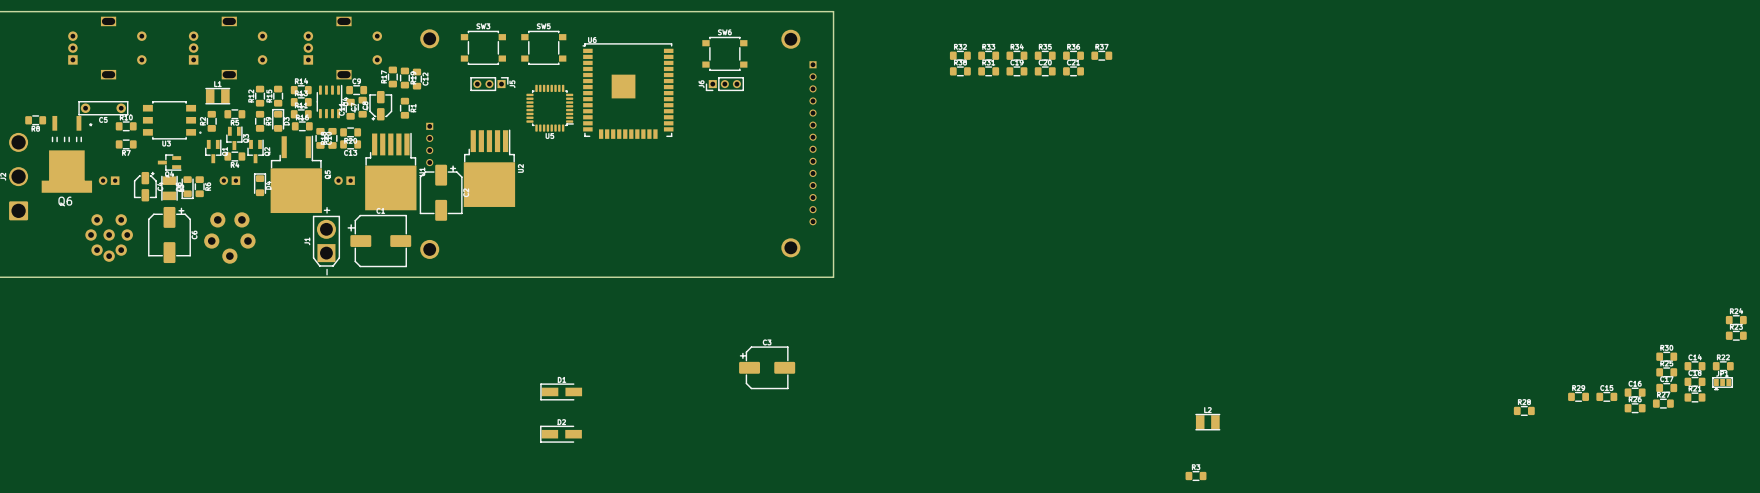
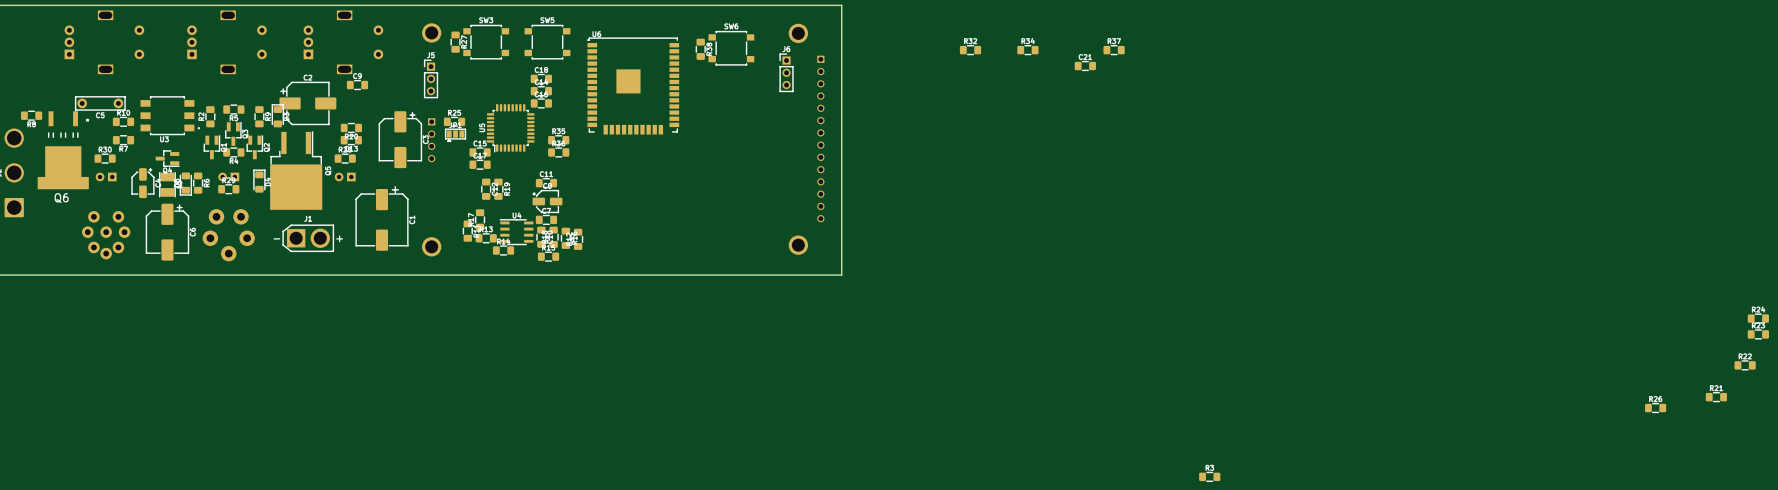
part: (988, 55) -> none
part position: (1045, 55) -> (558, 140)
part position: (1073, 55) -> (558, 152)
part rotation: 0° (960, 71) -> 90° clockwise (700, 49)
part position: (960, 71) -> (700, 49)
part: (988, 71) -> none
part: (1016, 71) -> none
part: (1045, 71) -> none
part position: (392, 77) -> (480, 219)
part position: (404, 78) -> (498, 189)
part position: (417, 79) -> (486, 189)
part rotation: 0° (489, 84) -> 90° counterclockwise (431, 78)
part position: (489, 84) -> (431, 78)
part rotation: 0° (724, 84) -> 90° clockwise (786, 72)
part position: (724, 84) -> (786, 72)
part position: (301, 90) -> (503, 250)
part: (217, 96) -> none
part position: (260, 96) -> (578, 239)
part rotation: 0° (278, 96) -> 90° clockwise (548, 256)
part position: (278, 96) -> (548, 256)
part rotation: 0° (329, 101) -> 90° counterclockwise (516, 232)
part position: (329, 101) -> (516, 232)
part position: (301, 102) -> (486, 238)
part rotation: 0° (380, 105) -> 90° clockwise (547, 201)
part position: (380, 105) -> (547, 201)
part rotation: 0° (362, 107) -> 90° clockwise (546, 219)
part position: (362, 107) -> (546, 219)
part: (404, 108) -> none
part rotation: 0° (549, 108) -> 90° clockwise (510, 128)
part position: (549, 108) -> (510, 128)
part rotation: 0° (350, 109) -> 90° clockwise (546, 183)
part position: (350, 109) -> (546, 183)
part rotation: 0° (301, 114) -> 90° clockwise (467, 231)
part position: (301, 114) -> (467, 231)
part rotation: 0° (302, 126) -> 90° clockwise (565, 238)
part position: (302, 126) -> (565, 238)
part position: (320, 138) -> (541, 237)
part position: (332, 138) -> (553, 237)
part: (489, 168) -> none
part: (390, 171) -> none
part rotation: 0° (441, 192) -> 90° counterclockwise (307, 103)
part position: (441, 192) -> (307, 103)
part rotation: 0° (326, 241) -> 90° clockwise (308, 238)
part rotation: 0° (379, 241) -> 90° clockwise (381, 218)
part position: (1666, 356) -> (105, 158)
part position: (1695, 366) -> (541, 91)
part rotation: 0° (767, 367) -> 90° clockwise (400, 139)
part position: (767, 367) -> (400, 139)
part position: (1666, 372) -> (454, 121)
part position: (1695, 381) -> (541, 78)
part position: (1722, 383) -> (455, 135)
part position: (1666, 387) -> (480, 164)
part: (561, 391) -> none
part position: (1635, 392) -> (541, 103)
part position: (1578, 396) -> (228, 189)
part position: (1606, 396) -> (480, 152)
part rotation: 0° (1663, 403) -> 90° clockwise (455, 42)
part position: (1663, 403) -> (455, 42)
part position: (1524, 410) -> (345, 158)
part: (1207, 422) -> none
part: (561, 434) -> none

